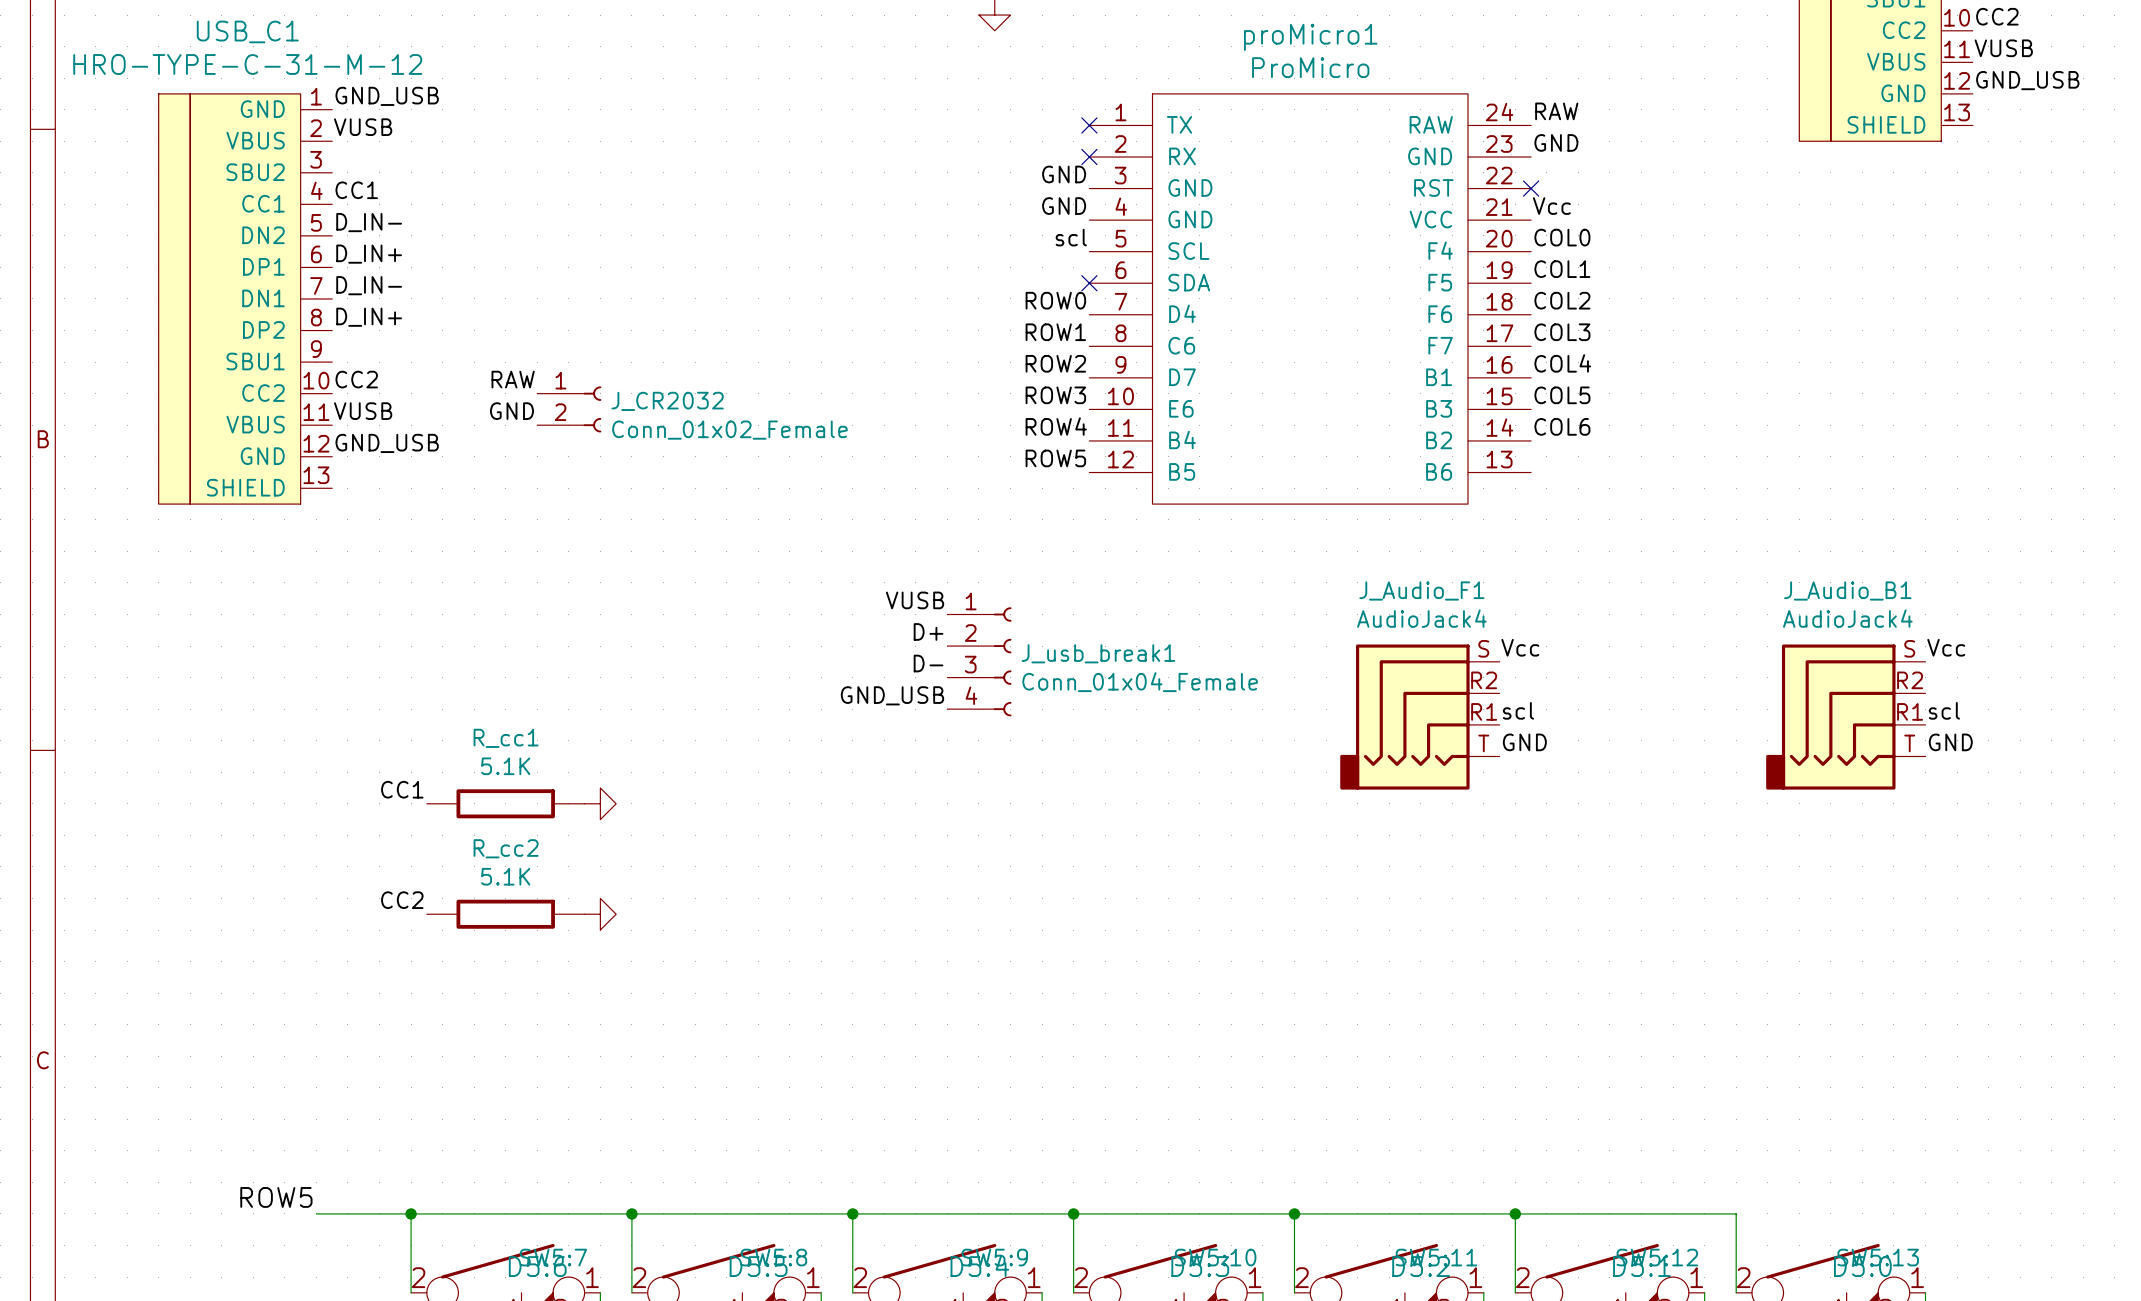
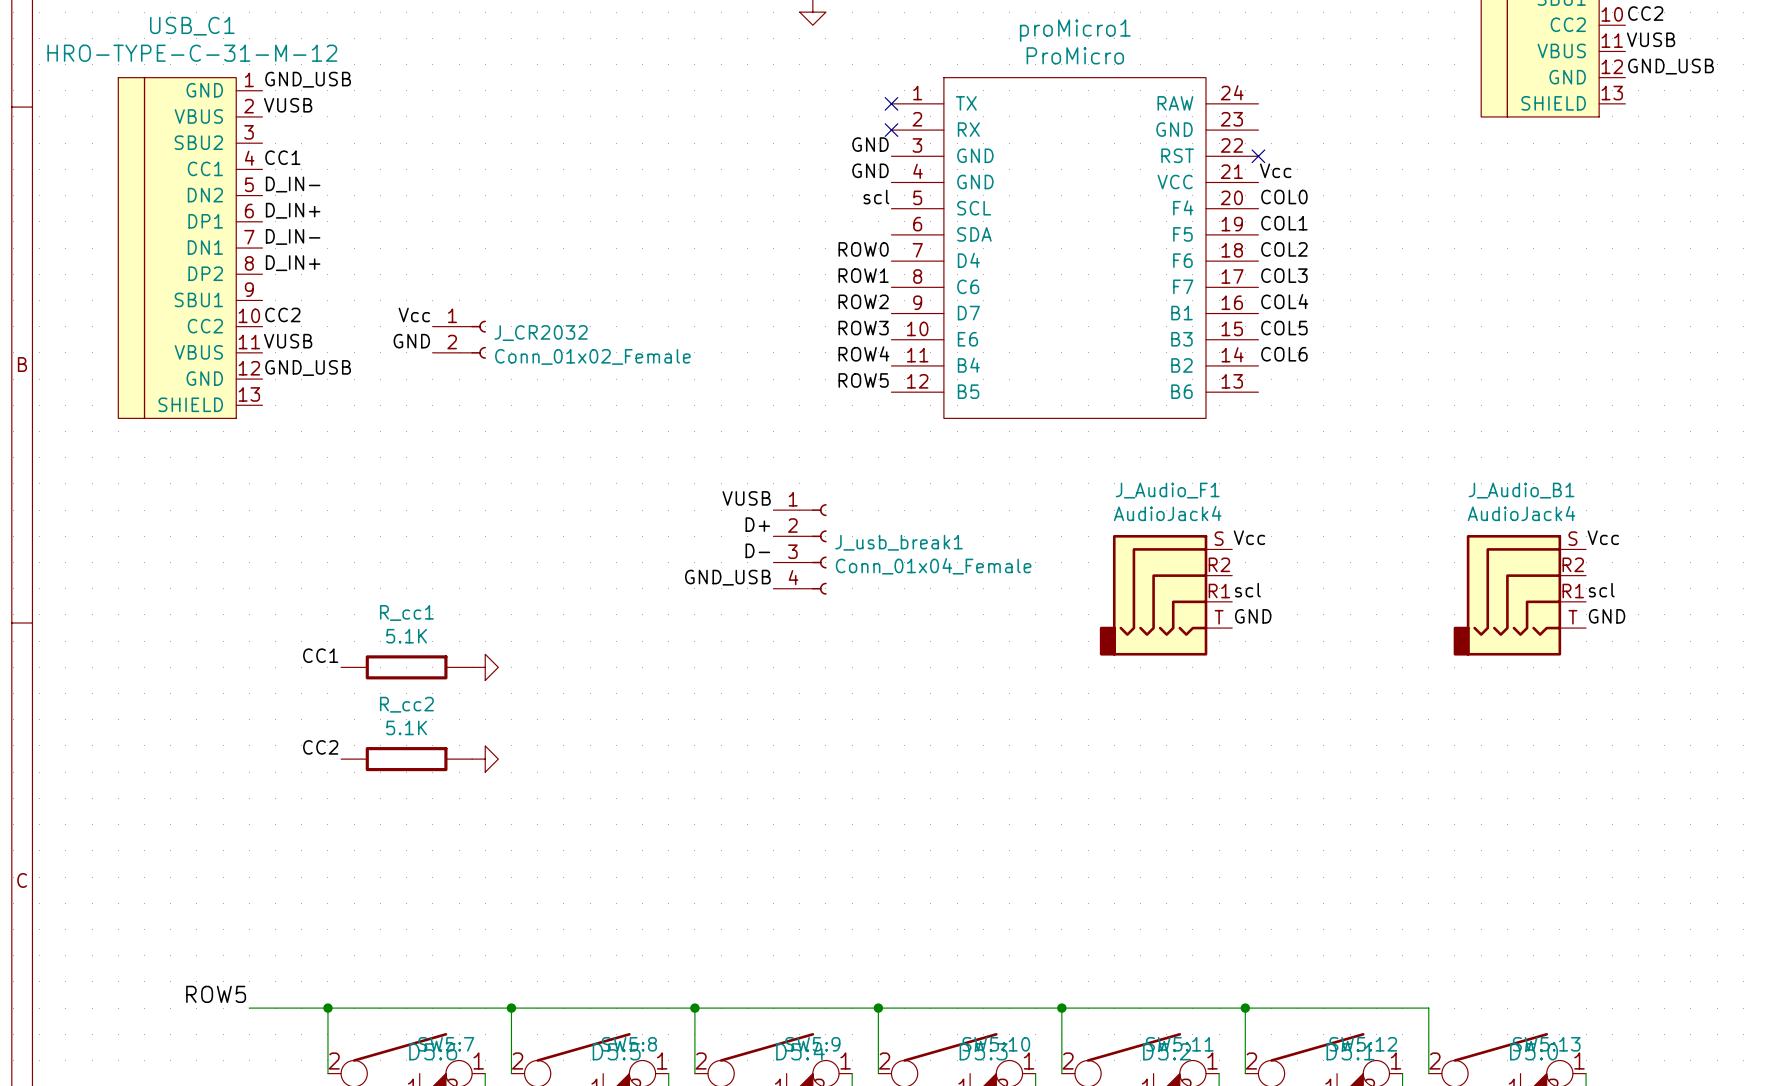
label: RAW (1556, 111) -> none
label: GND (1556, 142) -> none
no-connect mark: (1089, 283) -> none
label: RAW (513, 379) -> Vcc (414, 314)

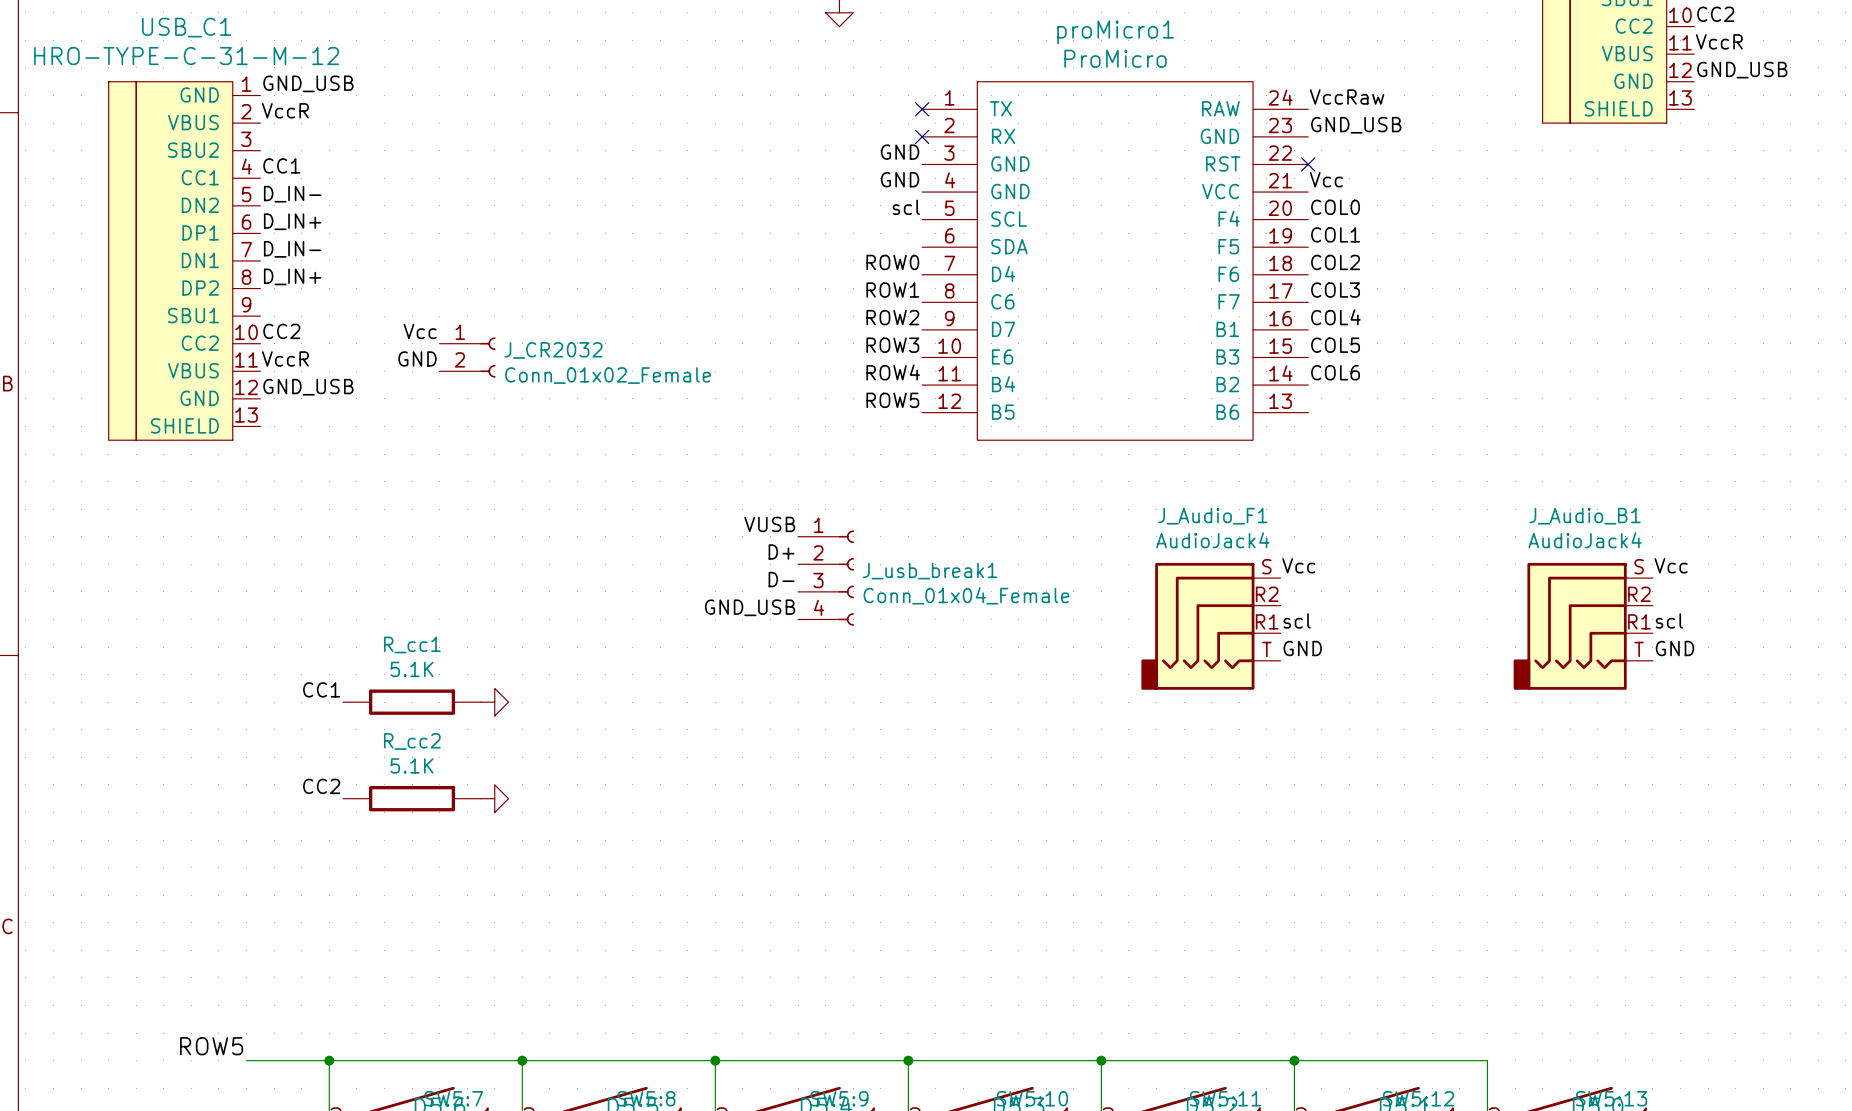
label: VUSB (1651, 39) -> VccR (1719, 41)
label: none -> VccRaw (1347, 97)
label: VUSB (288, 105) -> VccR (285, 110)
label: none -> GND_USB (1356, 125)
label: VUSB (288, 341) -> VccR (285, 358)

